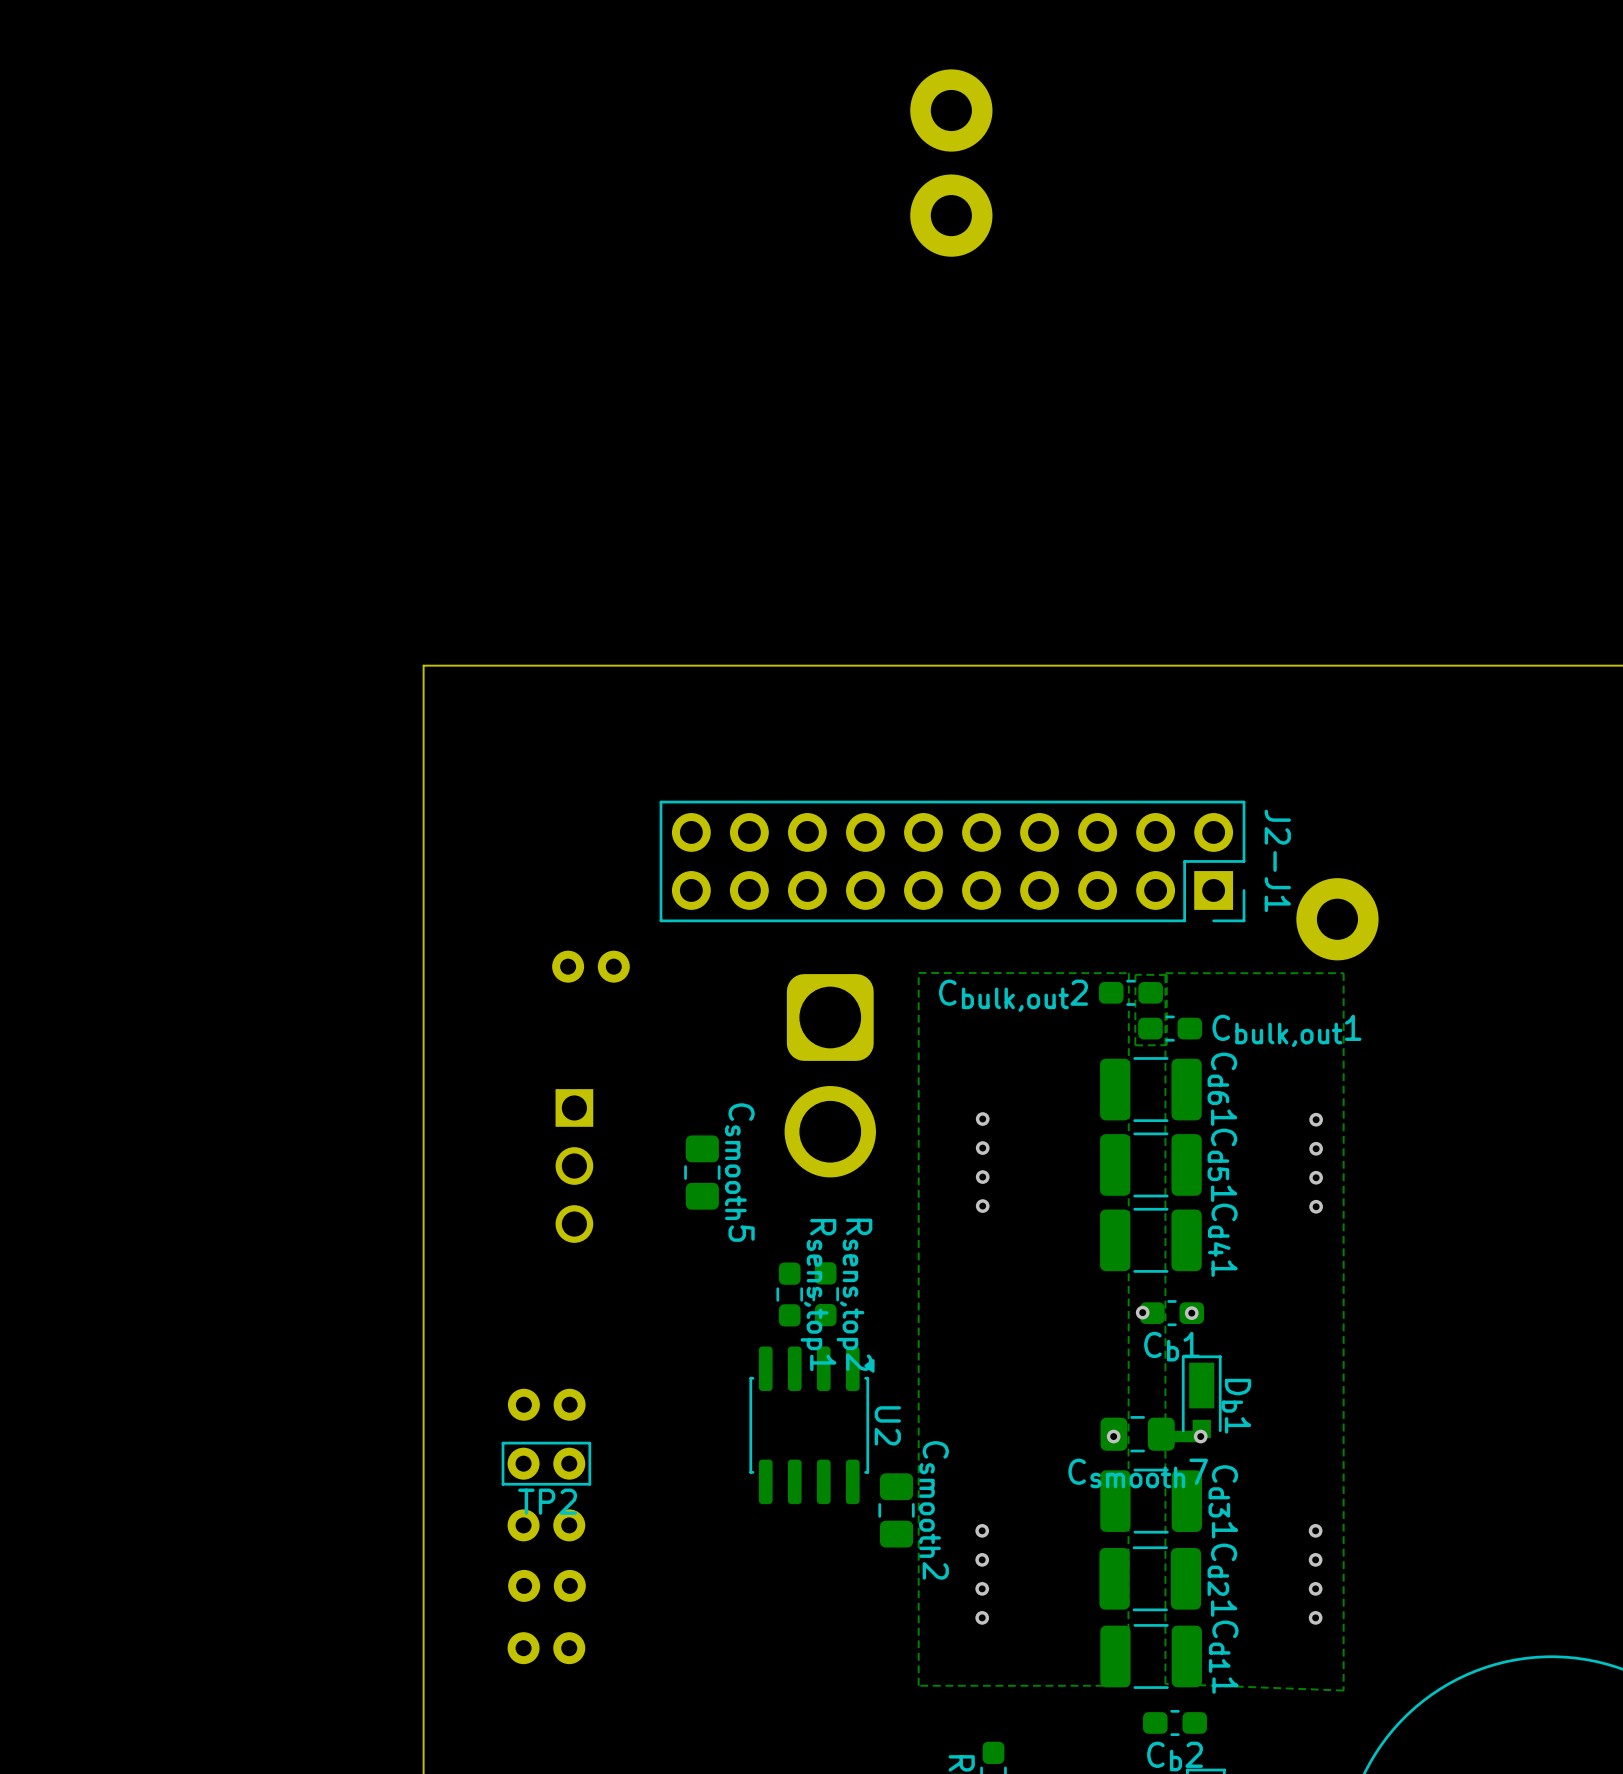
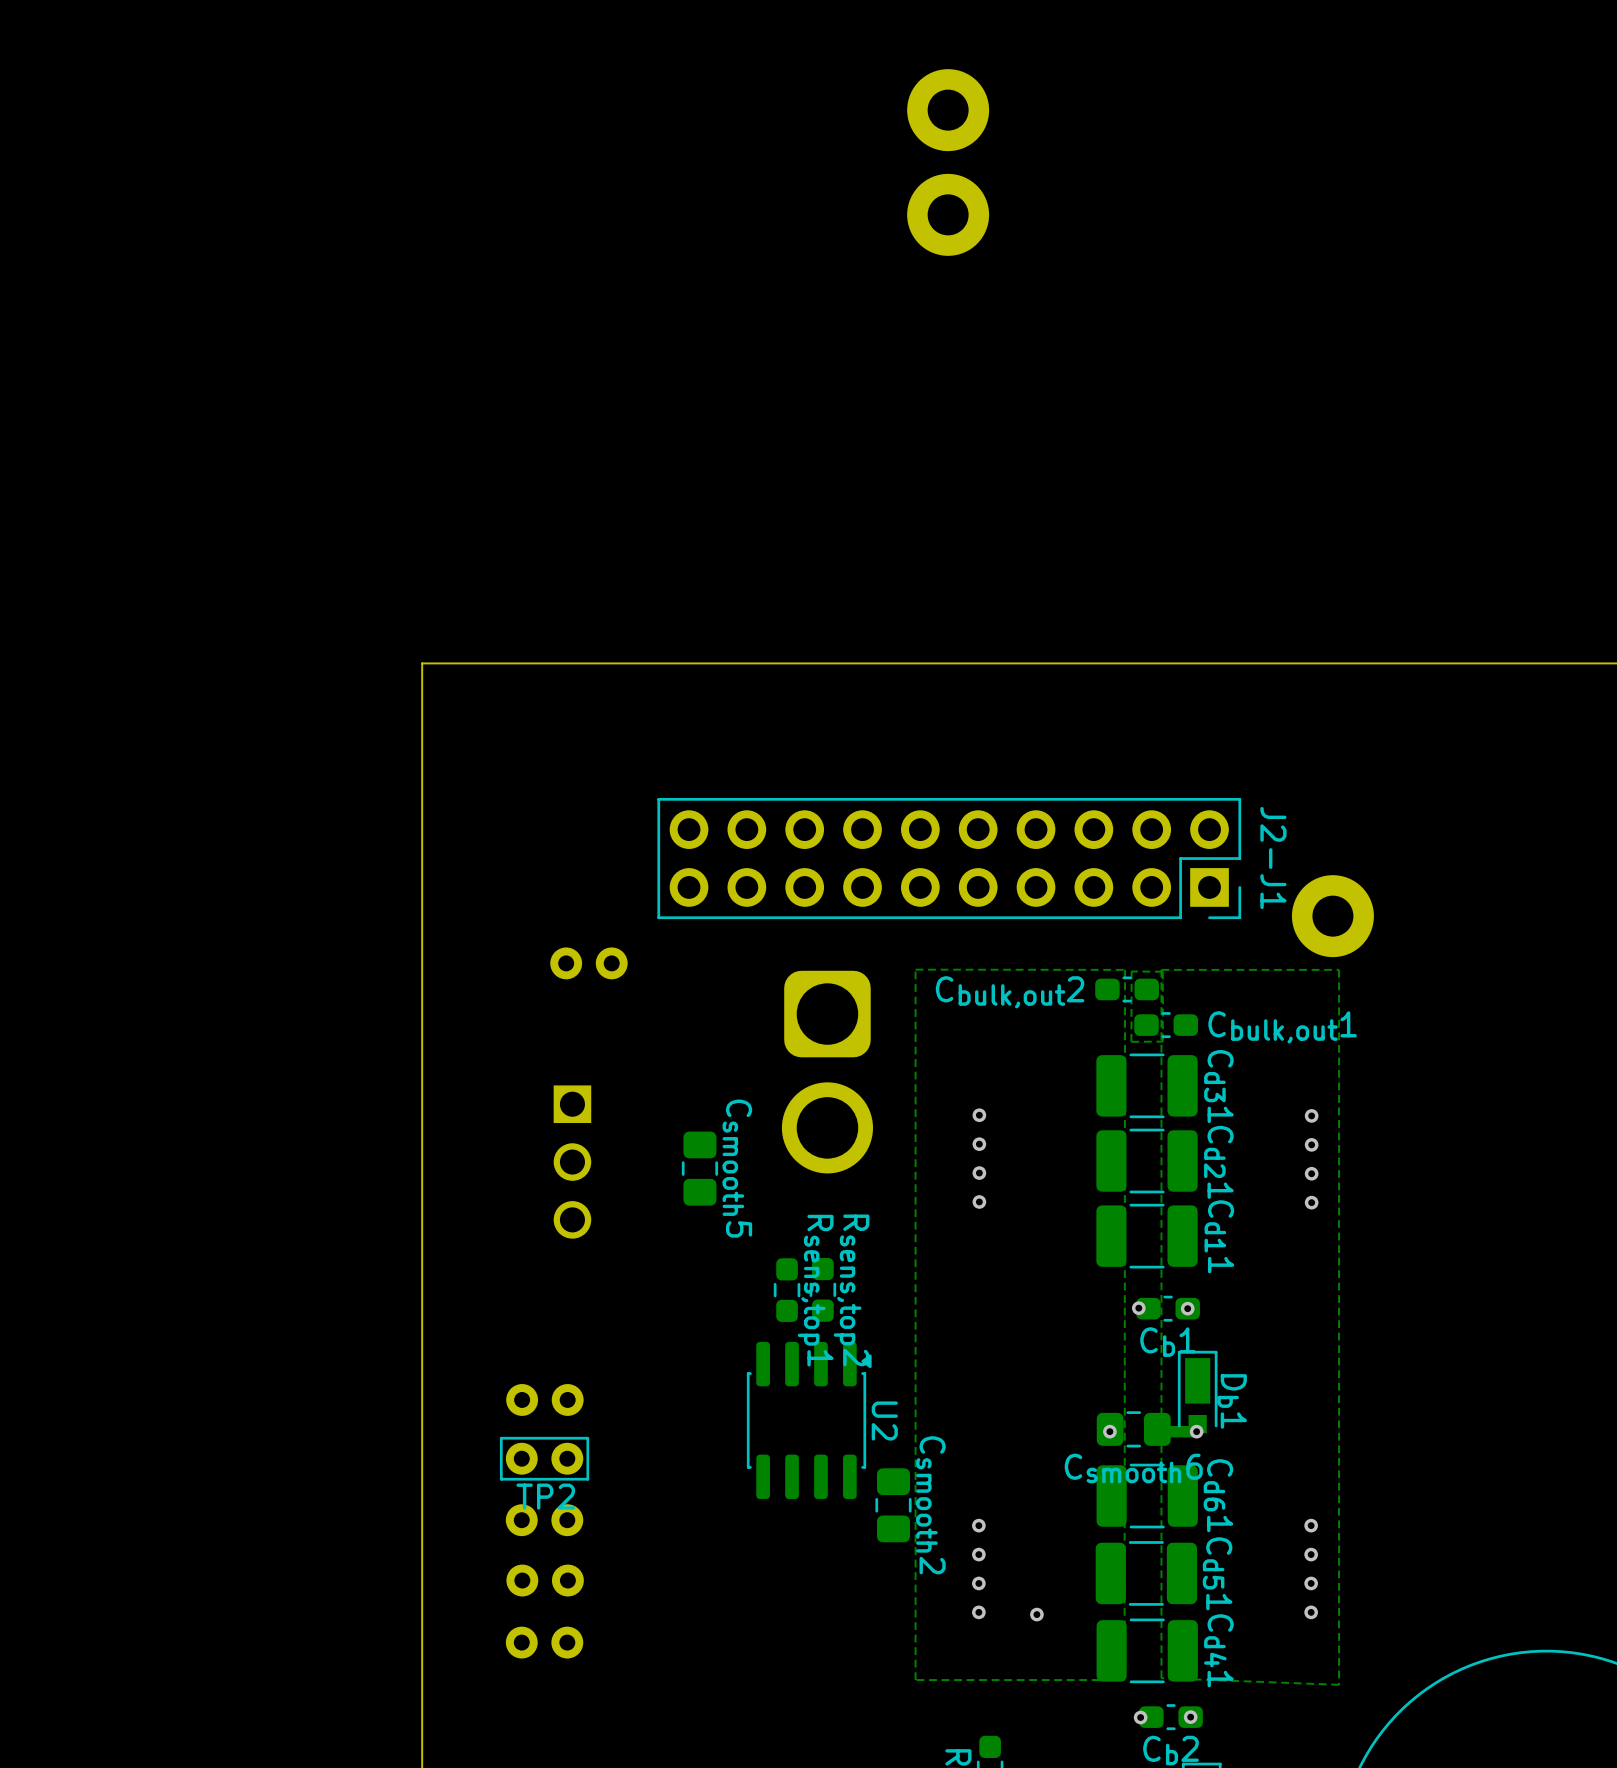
Cd61 name: Cd61 (1222, 1089) -> Cd31 (1218, 1086)
Cd51 name: Cd51 (1222, 1165) -> Cd21 (1218, 1162)
Cd41 name: Cd41 (1222, 1240) -> Cd11 (1219, 1236)
Csmooth7 name: Csmooth7 (1138, 1473) -> Csmooth6 (1133, 1468)
Cd31 name: Cd31 (1223, 1501) -> Cd61 (1218, 1495)
Cd21 name: Cd21 (1222, 1580) -> Cd51 (1217, 1573)
via: none -> (1036, 1614)
Cd11 name: Cd11 (1223, 1657) -> Cd41 (1218, 1650)
via: none -> (1190, 1717)
via: none -> (1140, 1717)

